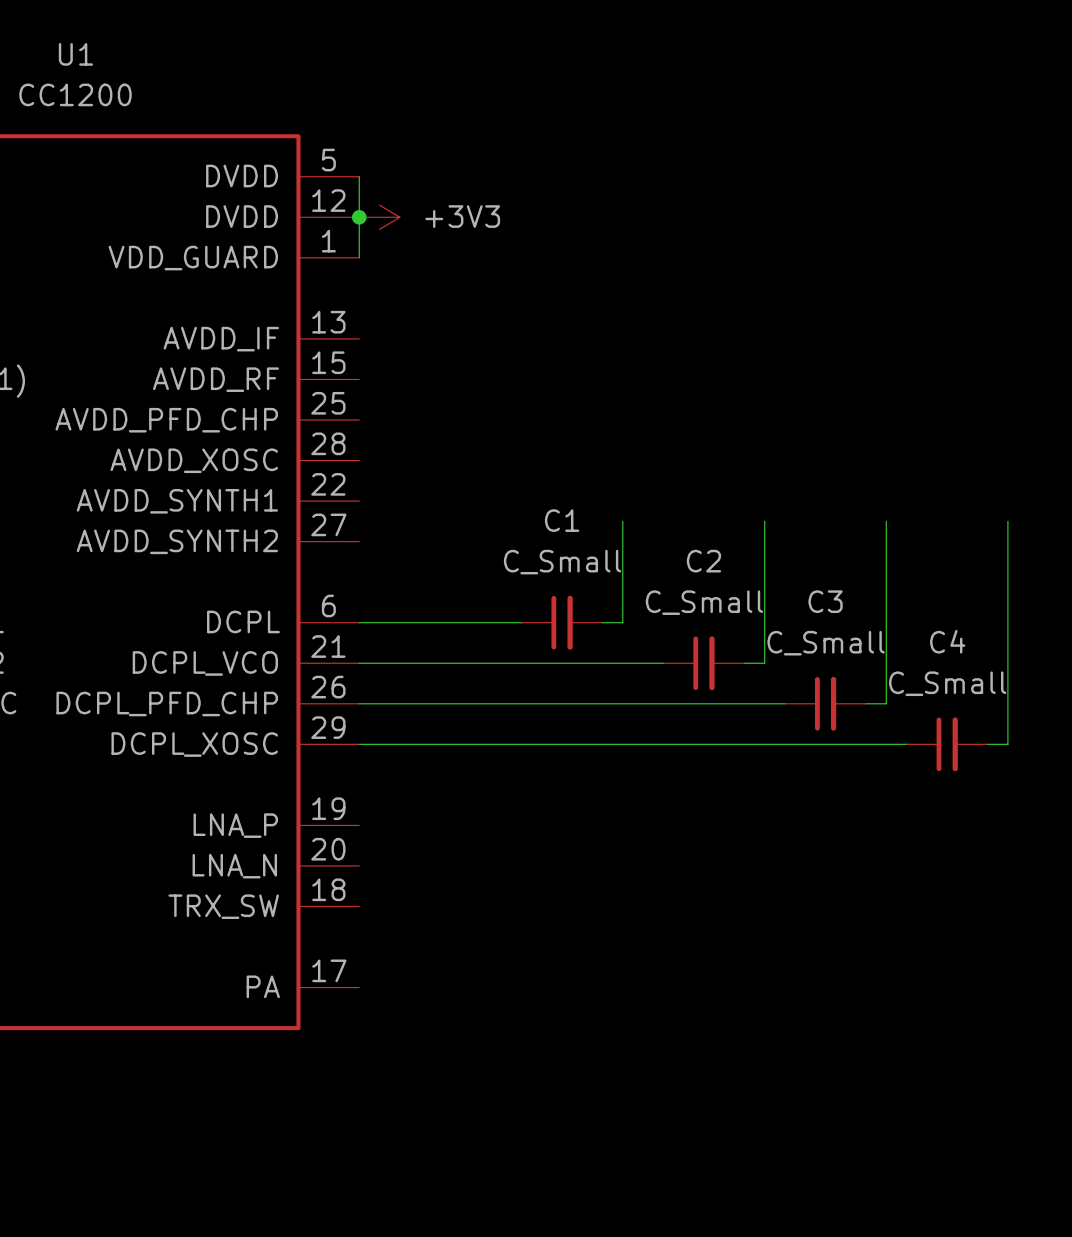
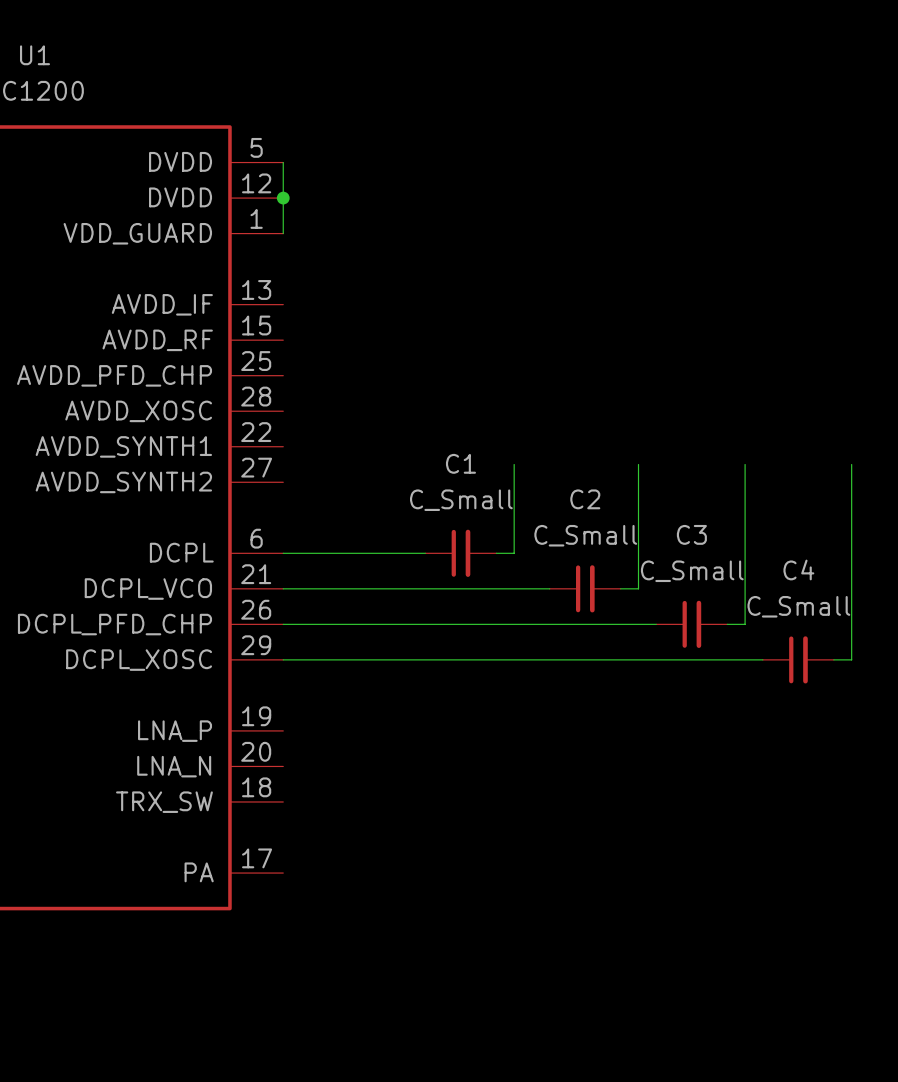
power symbol: +3V3 (379, 217) -> none

